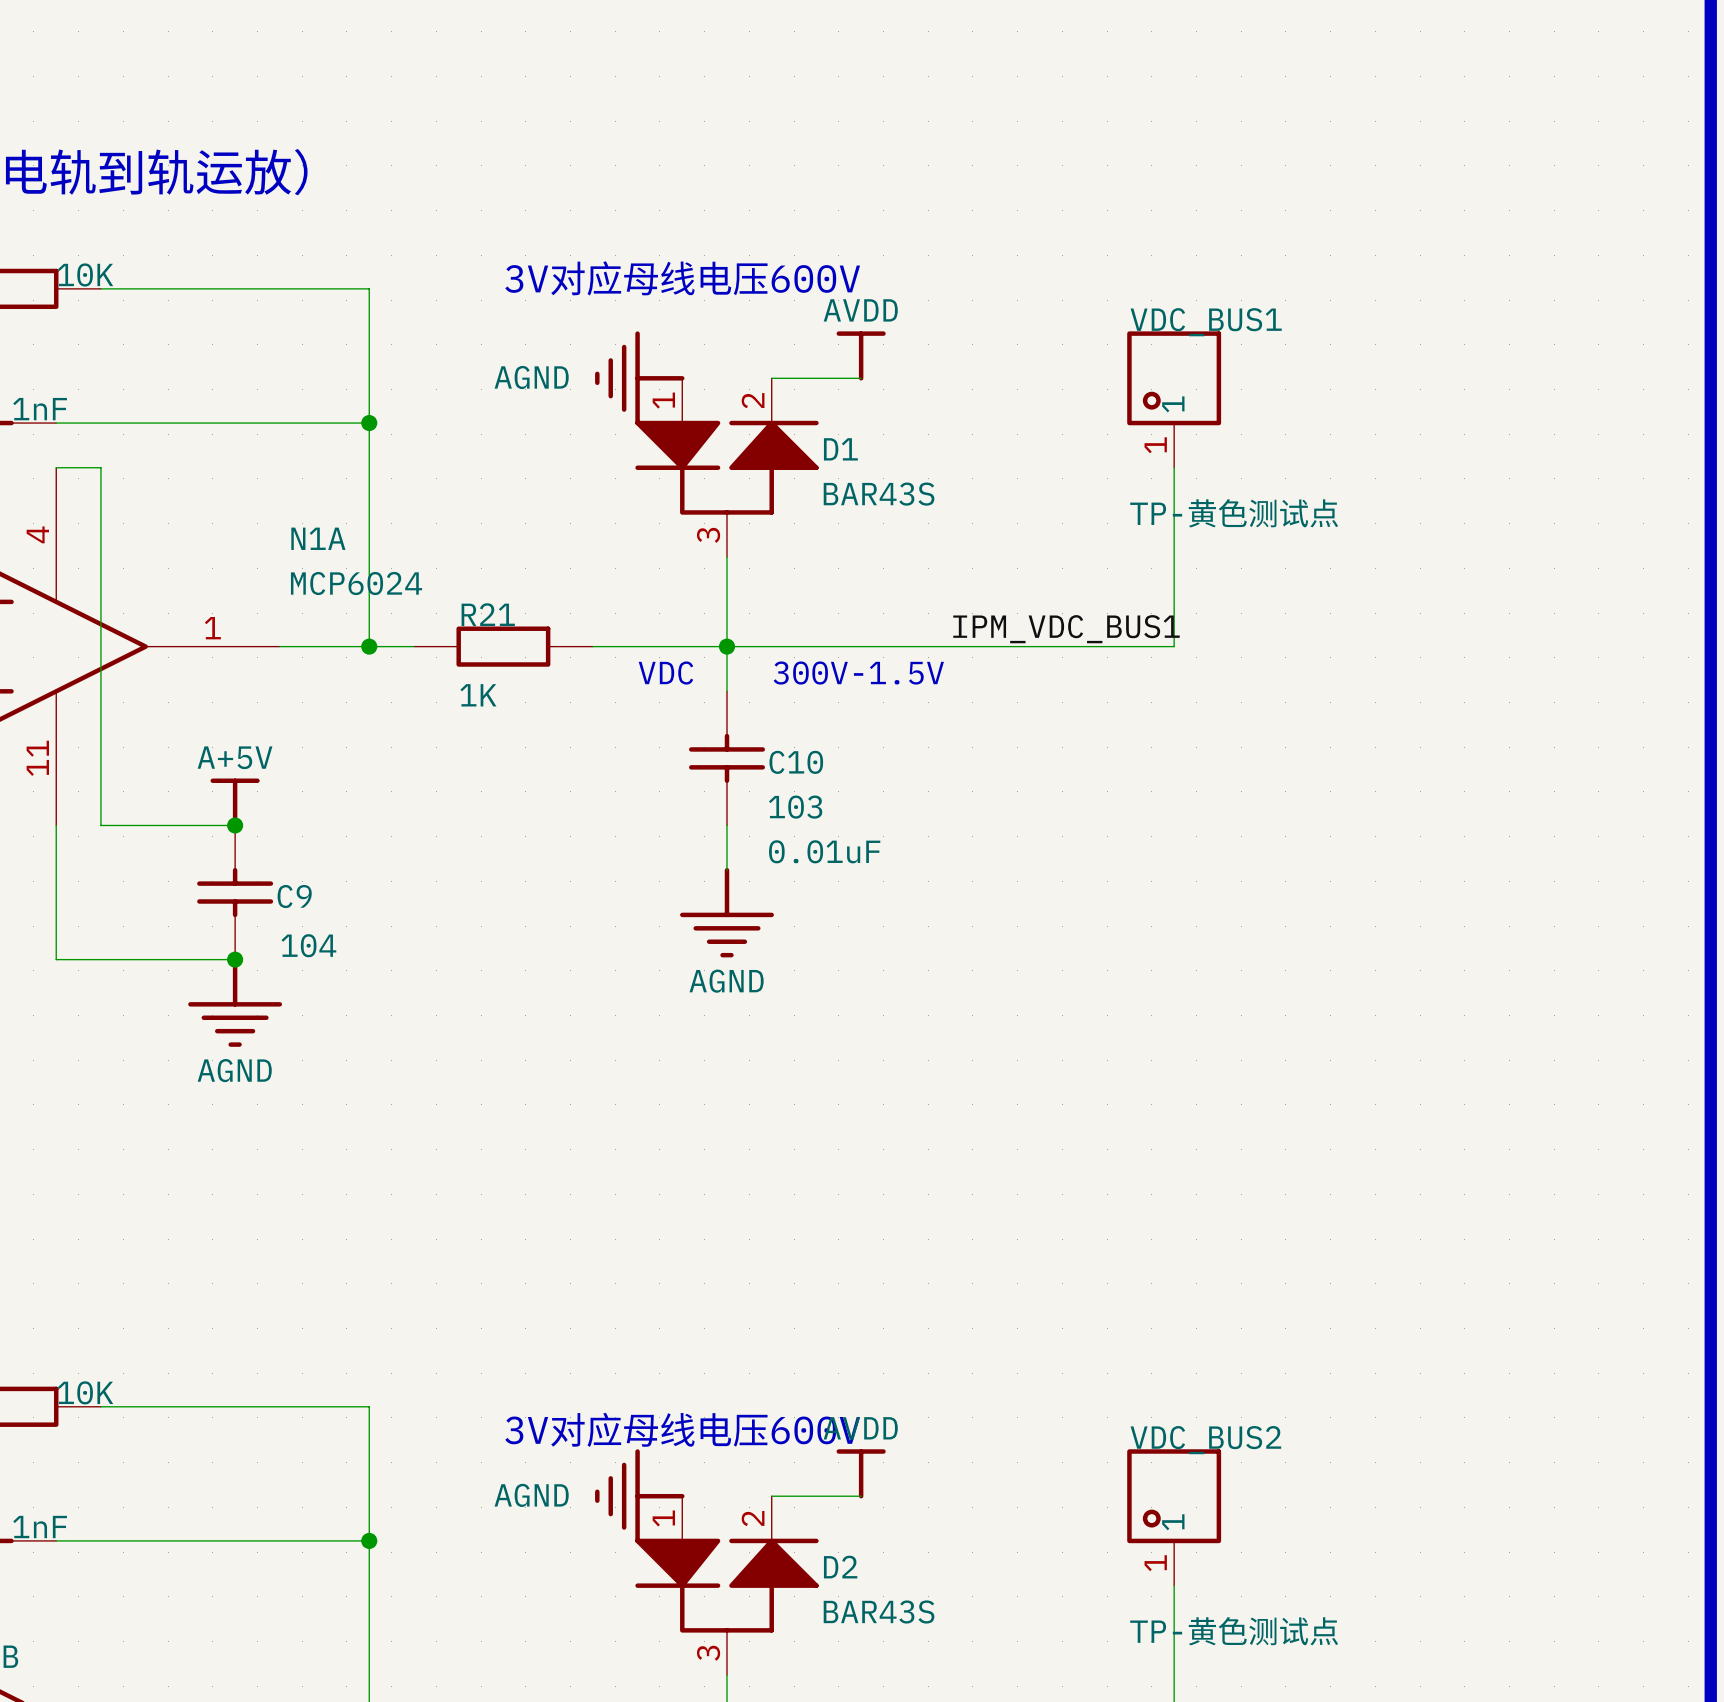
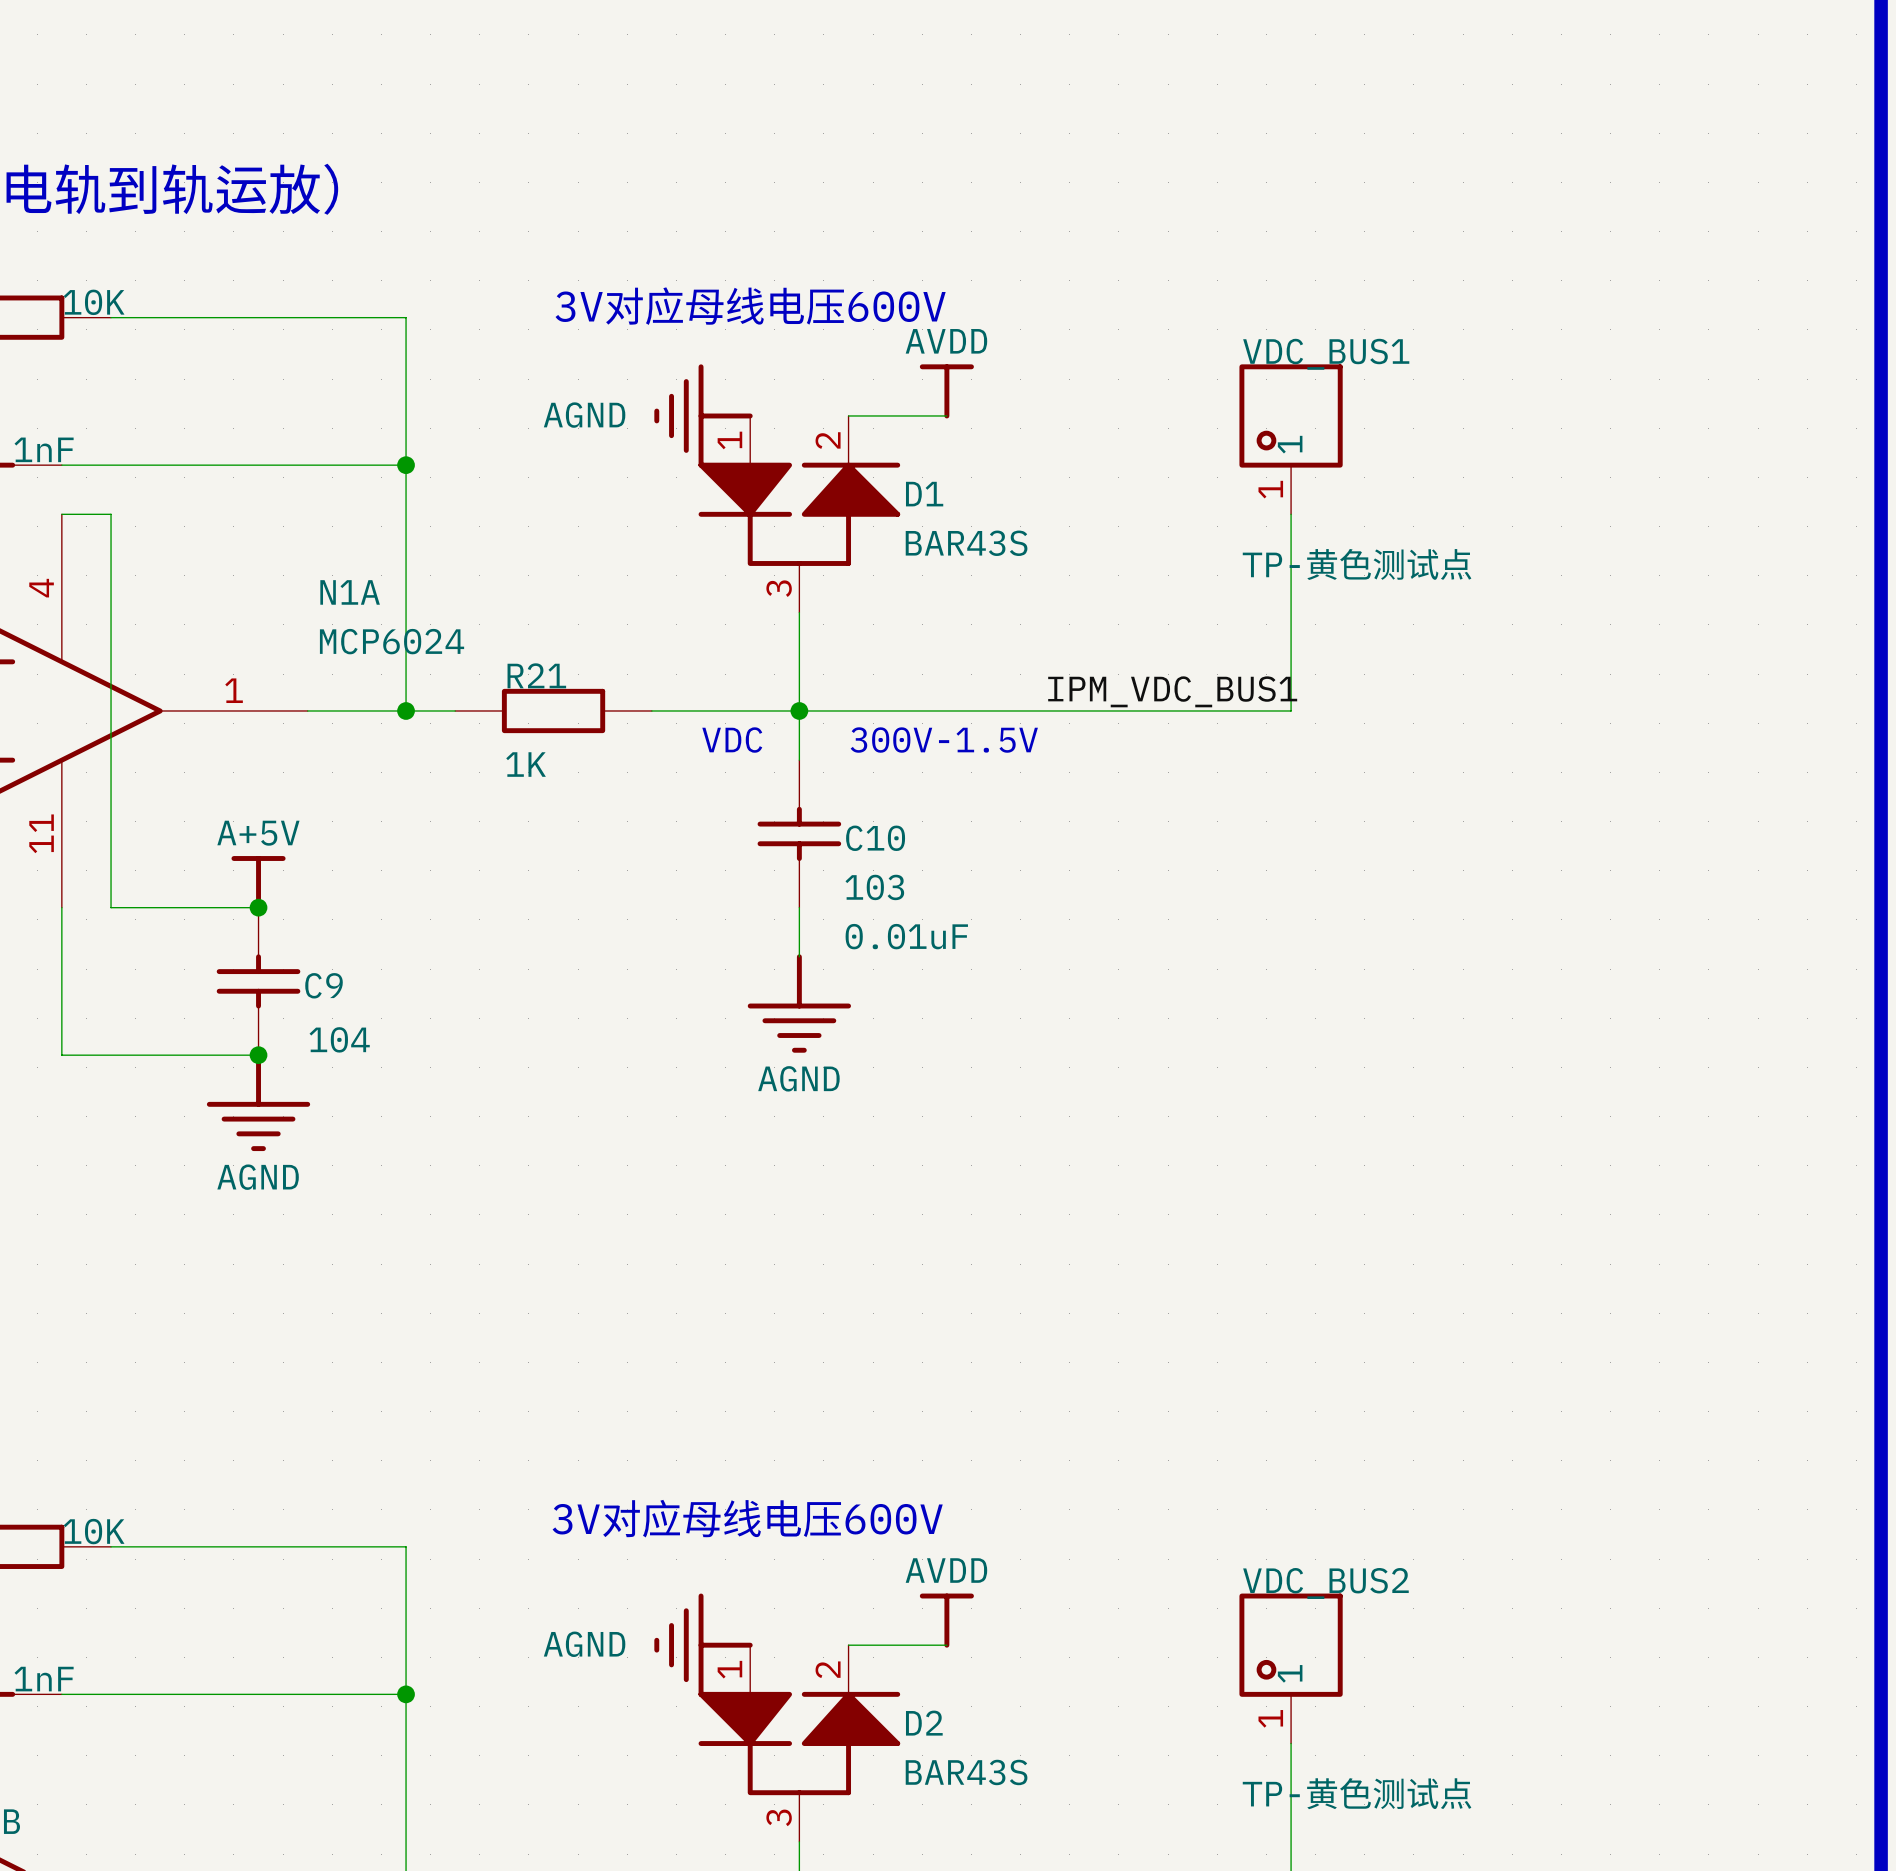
text position: 3V对应母线电压600V (682, 1429) -> 3V对应母线电压600V (747, 1518)

